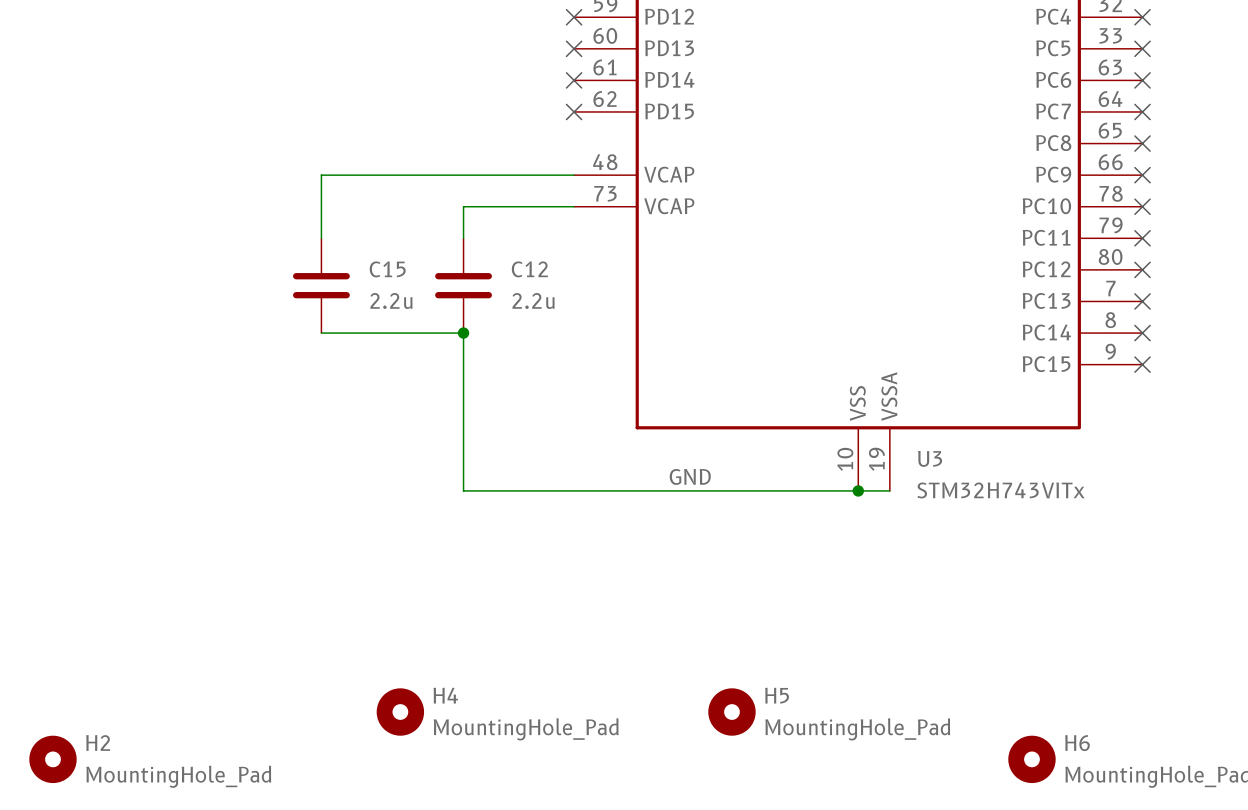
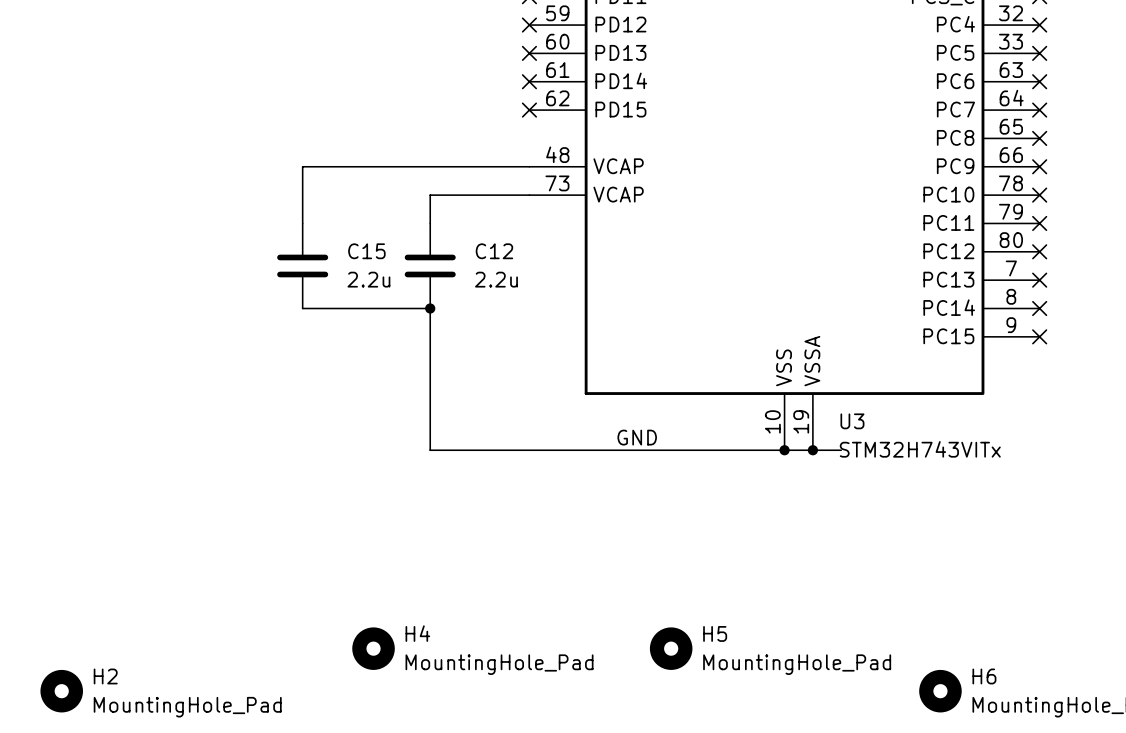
wire: none -> (812, 450) (841, 450)
junction: none -> (812, 450)

